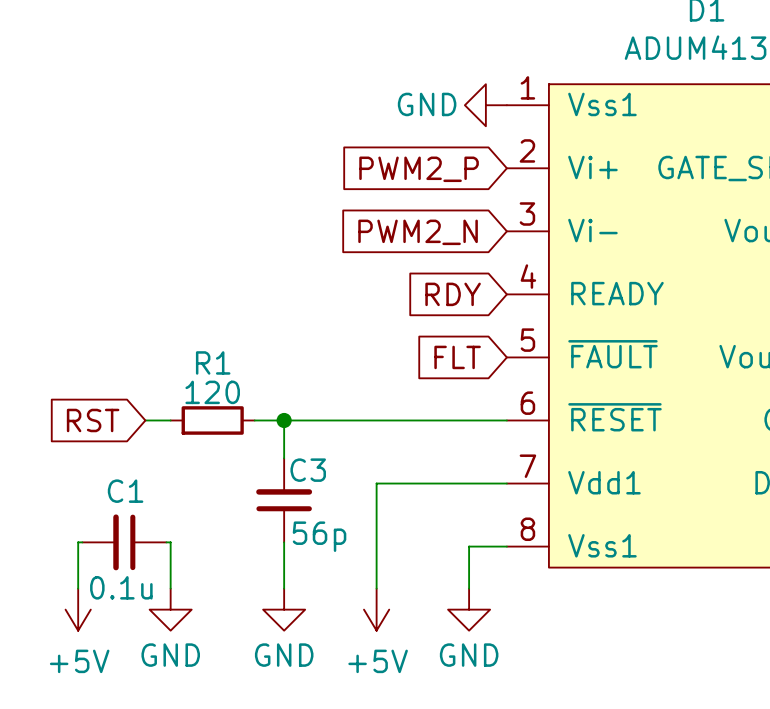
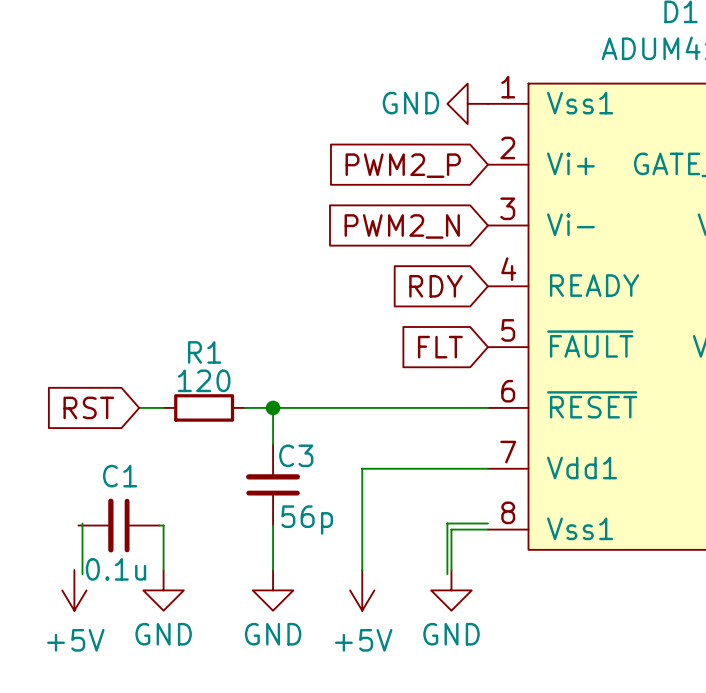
wire: none -> (82, 523) (82, 574)
wire: none -> (487, 523) (447, 523) (447, 574)
wire: (82, 542) (78, 542) (78, 588) -> none

